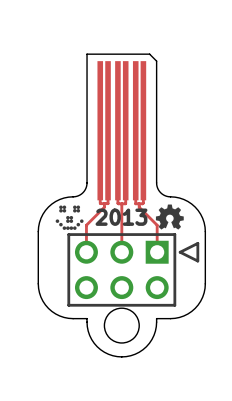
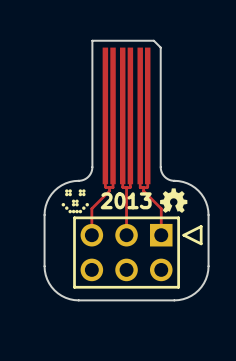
round board edge: [103, 307, 140, 344] -> none
board edge: (87, 318) (89, 335) (97, 346) (108, 354) (121, 356) (135, 354) (146, 346) (153, 335) (156, 318) -> (92, 300) (160, 300)

